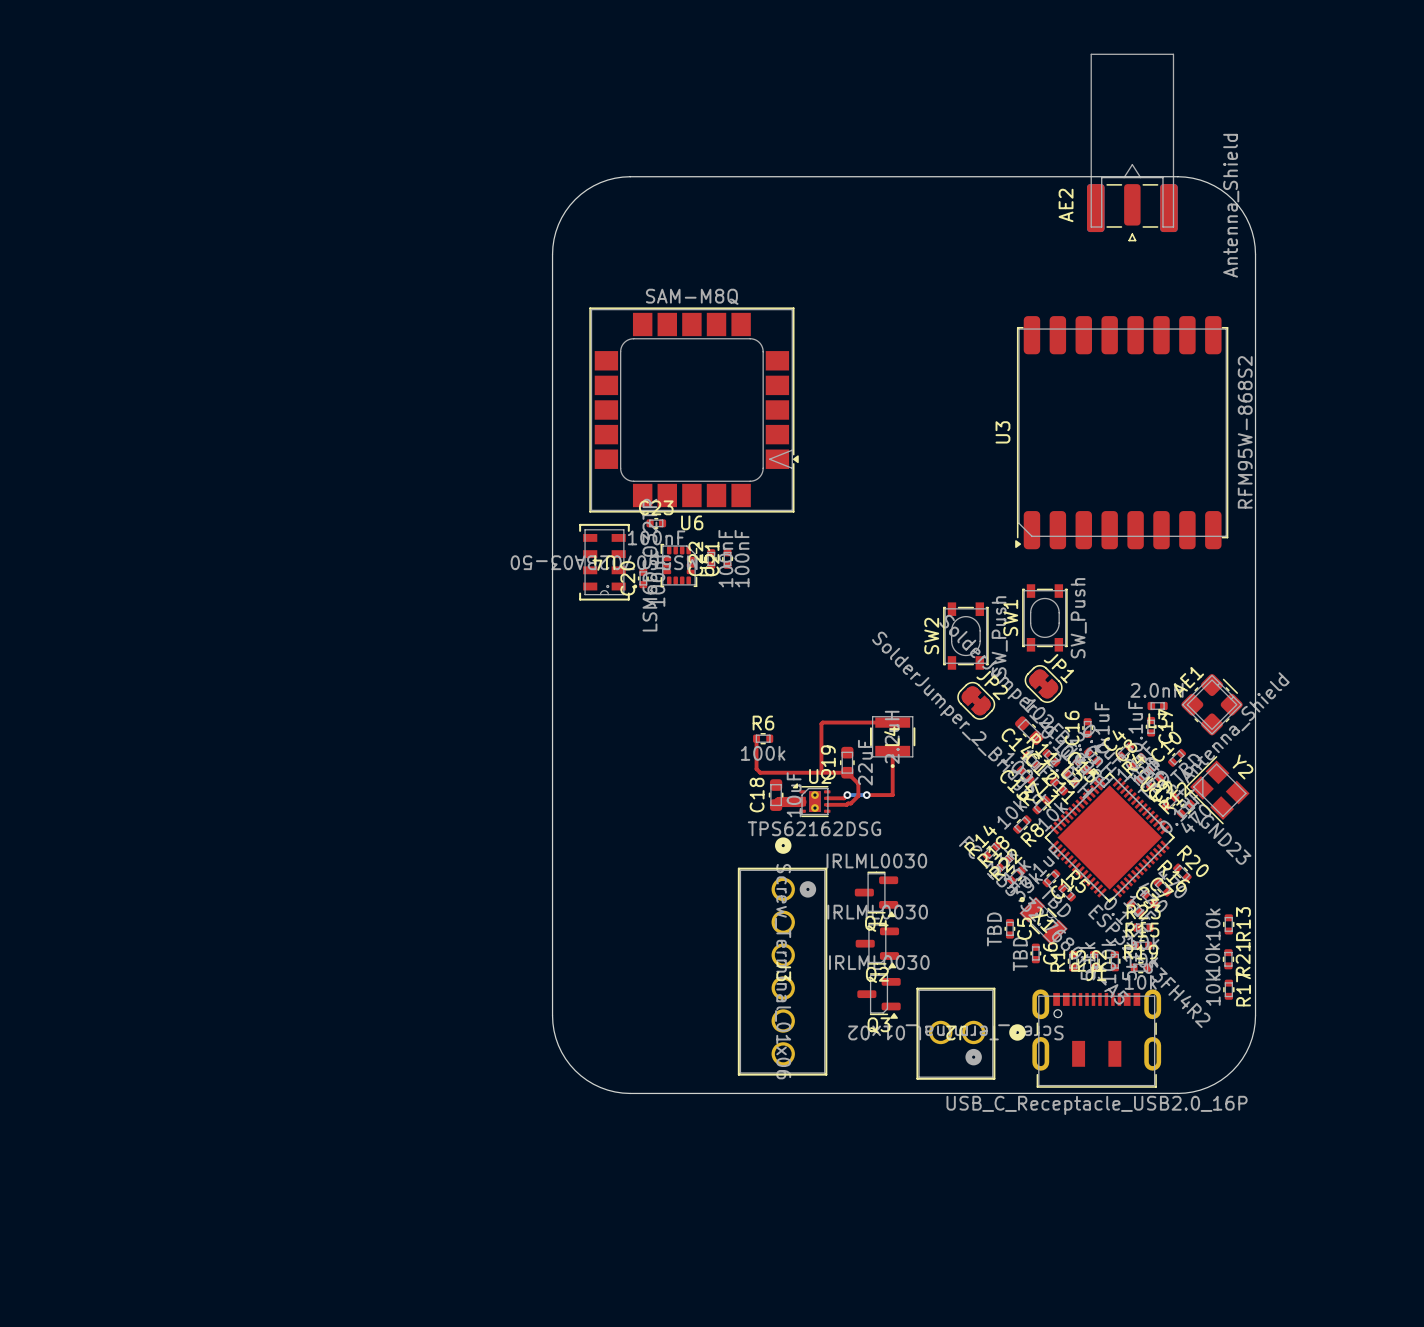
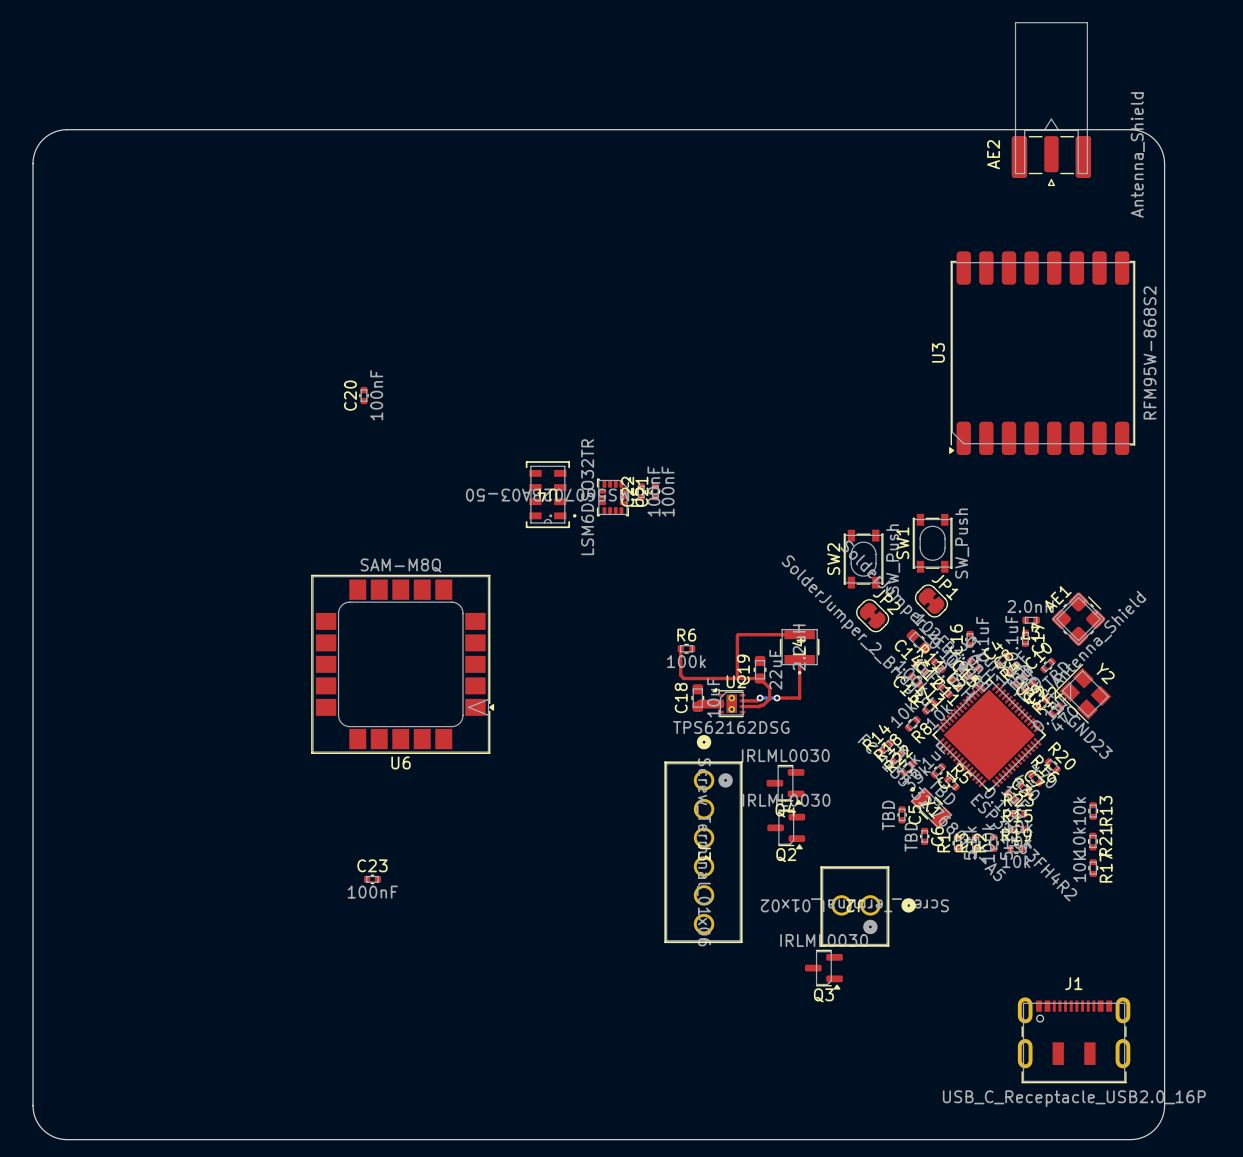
board edge: none -> (66, 129) (1130, 129) (1143, 132) (1154, 139) (1162, 150) (1164, 163) (1164, 1105) (1162, 1118) (1154, 1129) (1143, 1137) (1130, 1139) (66, 1139) (53, 1137) (42, 1129) (35, 1118) (33, 1105) (33, 163) (35, 150) (42, 139) (53, 132) (66, 129)
AE2 position: (1132, 147) -> (1051, 104)
U6 position: (694, 410) -> (402, 664)
U3 position: (1121, 432) -> (1042, 353)
C23 position: (656, 523) -> (372, 879)
C20 position: (643, 578) -> (363, 395)
Q3 position: (879, 995) -> (823, 969)
J1 position: (1096, 1038) -> (1074, 1040)
board edge: (1177, 1093) (622, 1093) (593, 1084) (575, 1070) (565, 1058) (555, 1038) (552, 1015) (552, 254) (554, 239) (561, 217) (575, 199) (587, 189) (607, 180) (630, 176) (1177, 176) (1192, 178) (1214, 185) (1232, 199) (1242, 211) (1252, 231) (1255, 254) (1255, 1023) (1246, 1052) (1232, 1070) (1207, 1087) (1177, 1093) -> none

